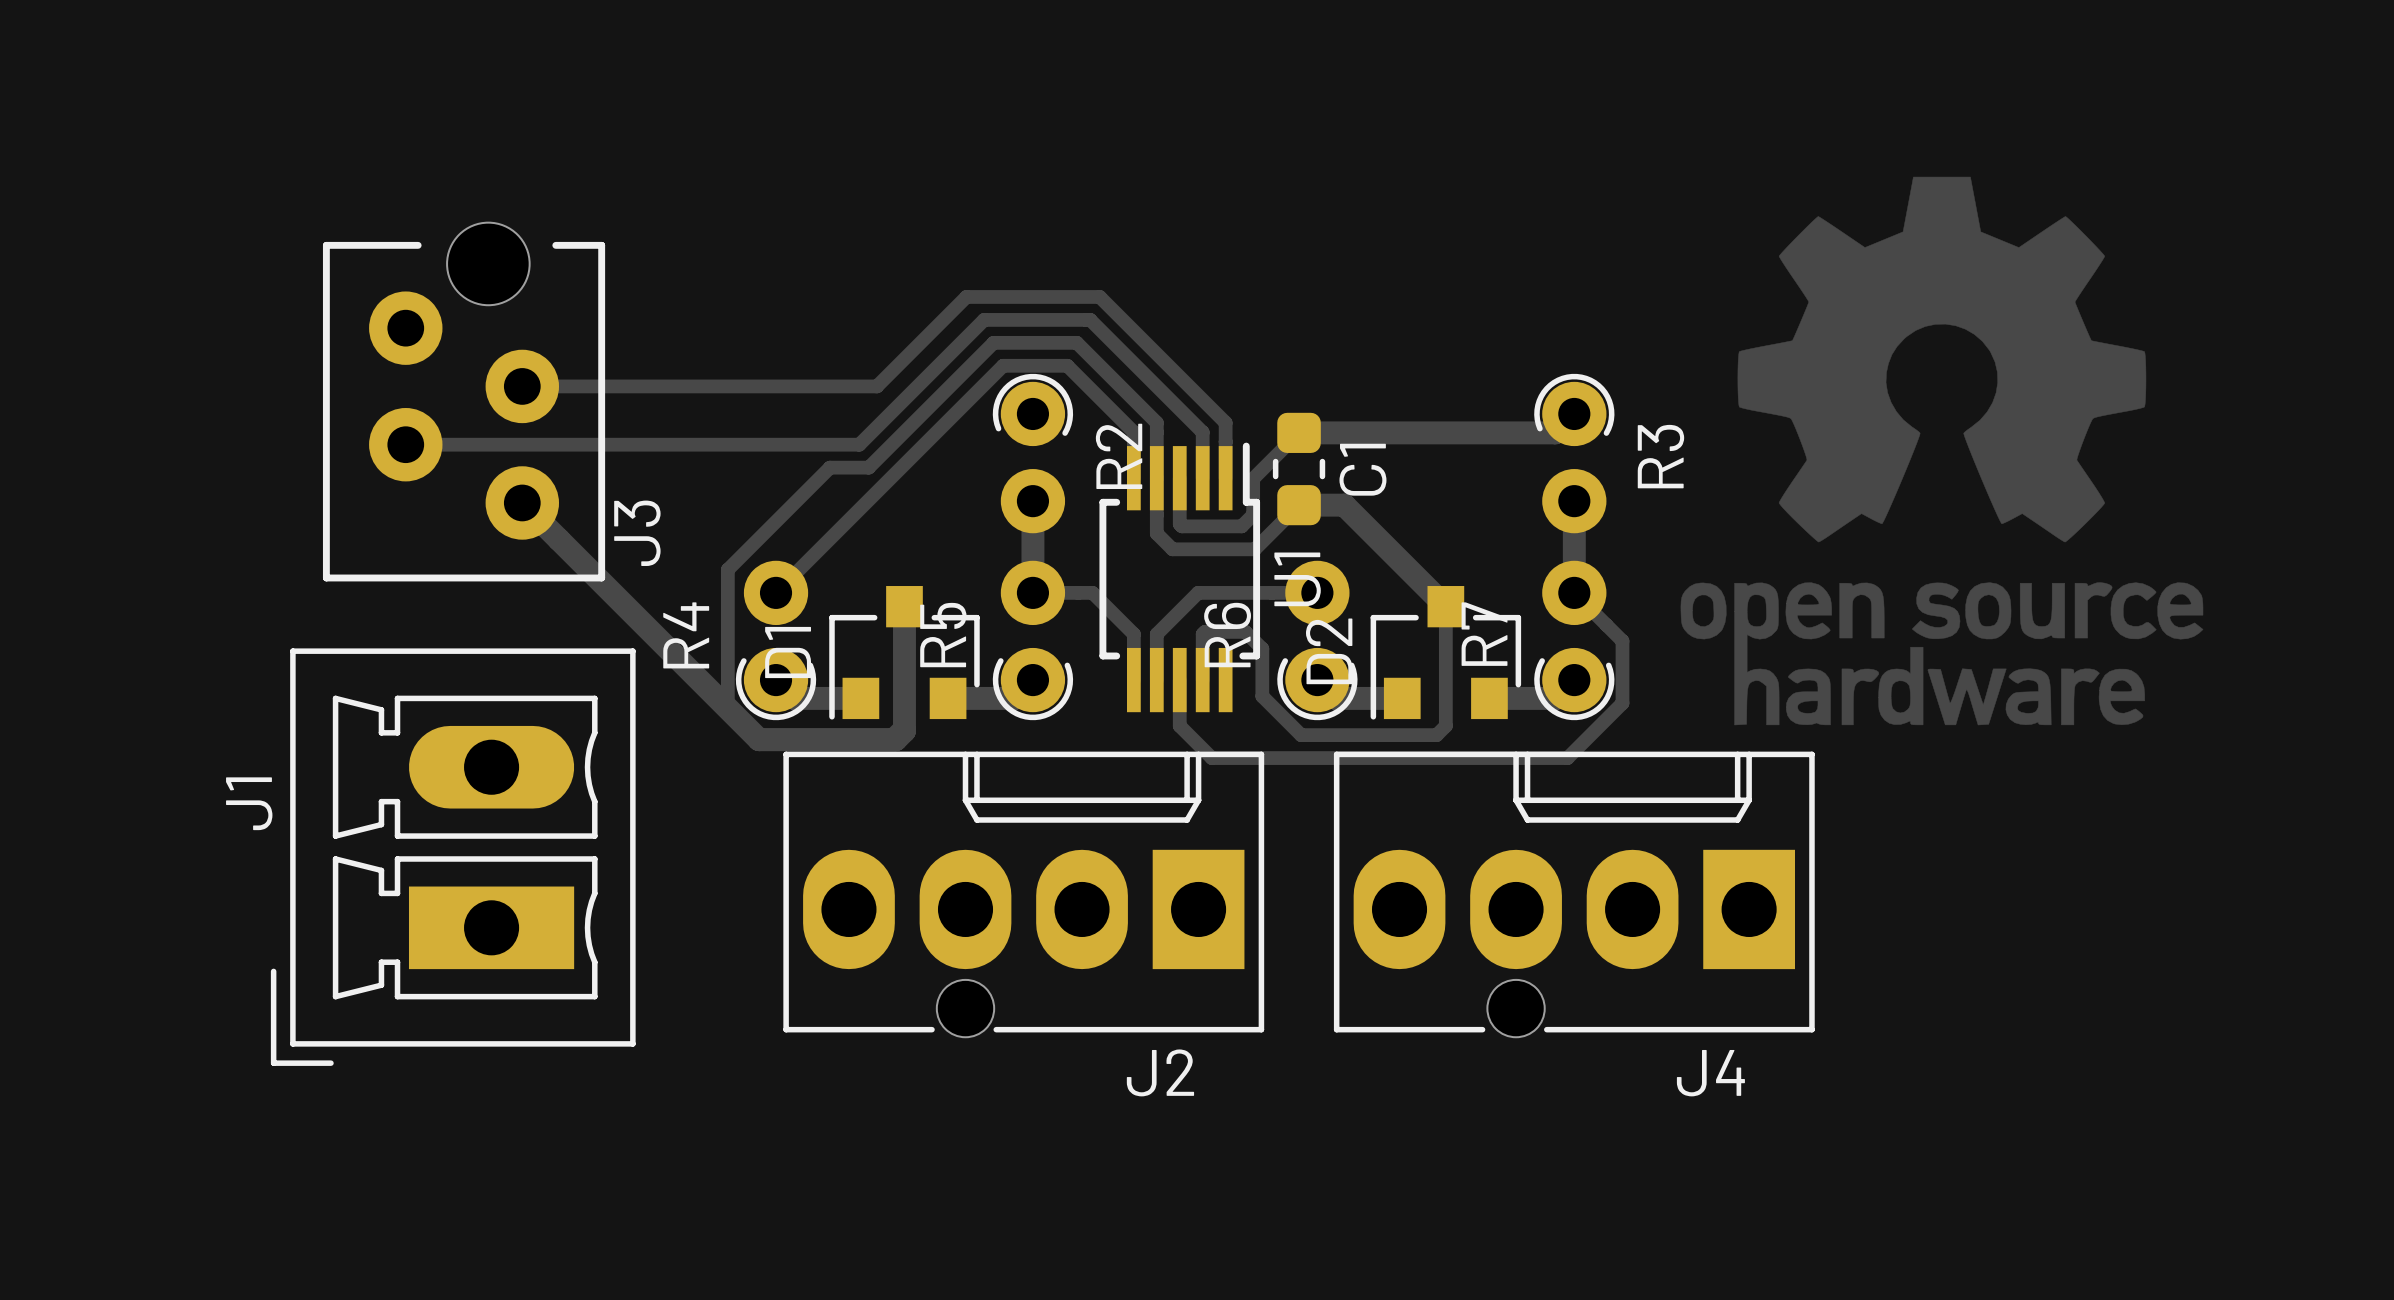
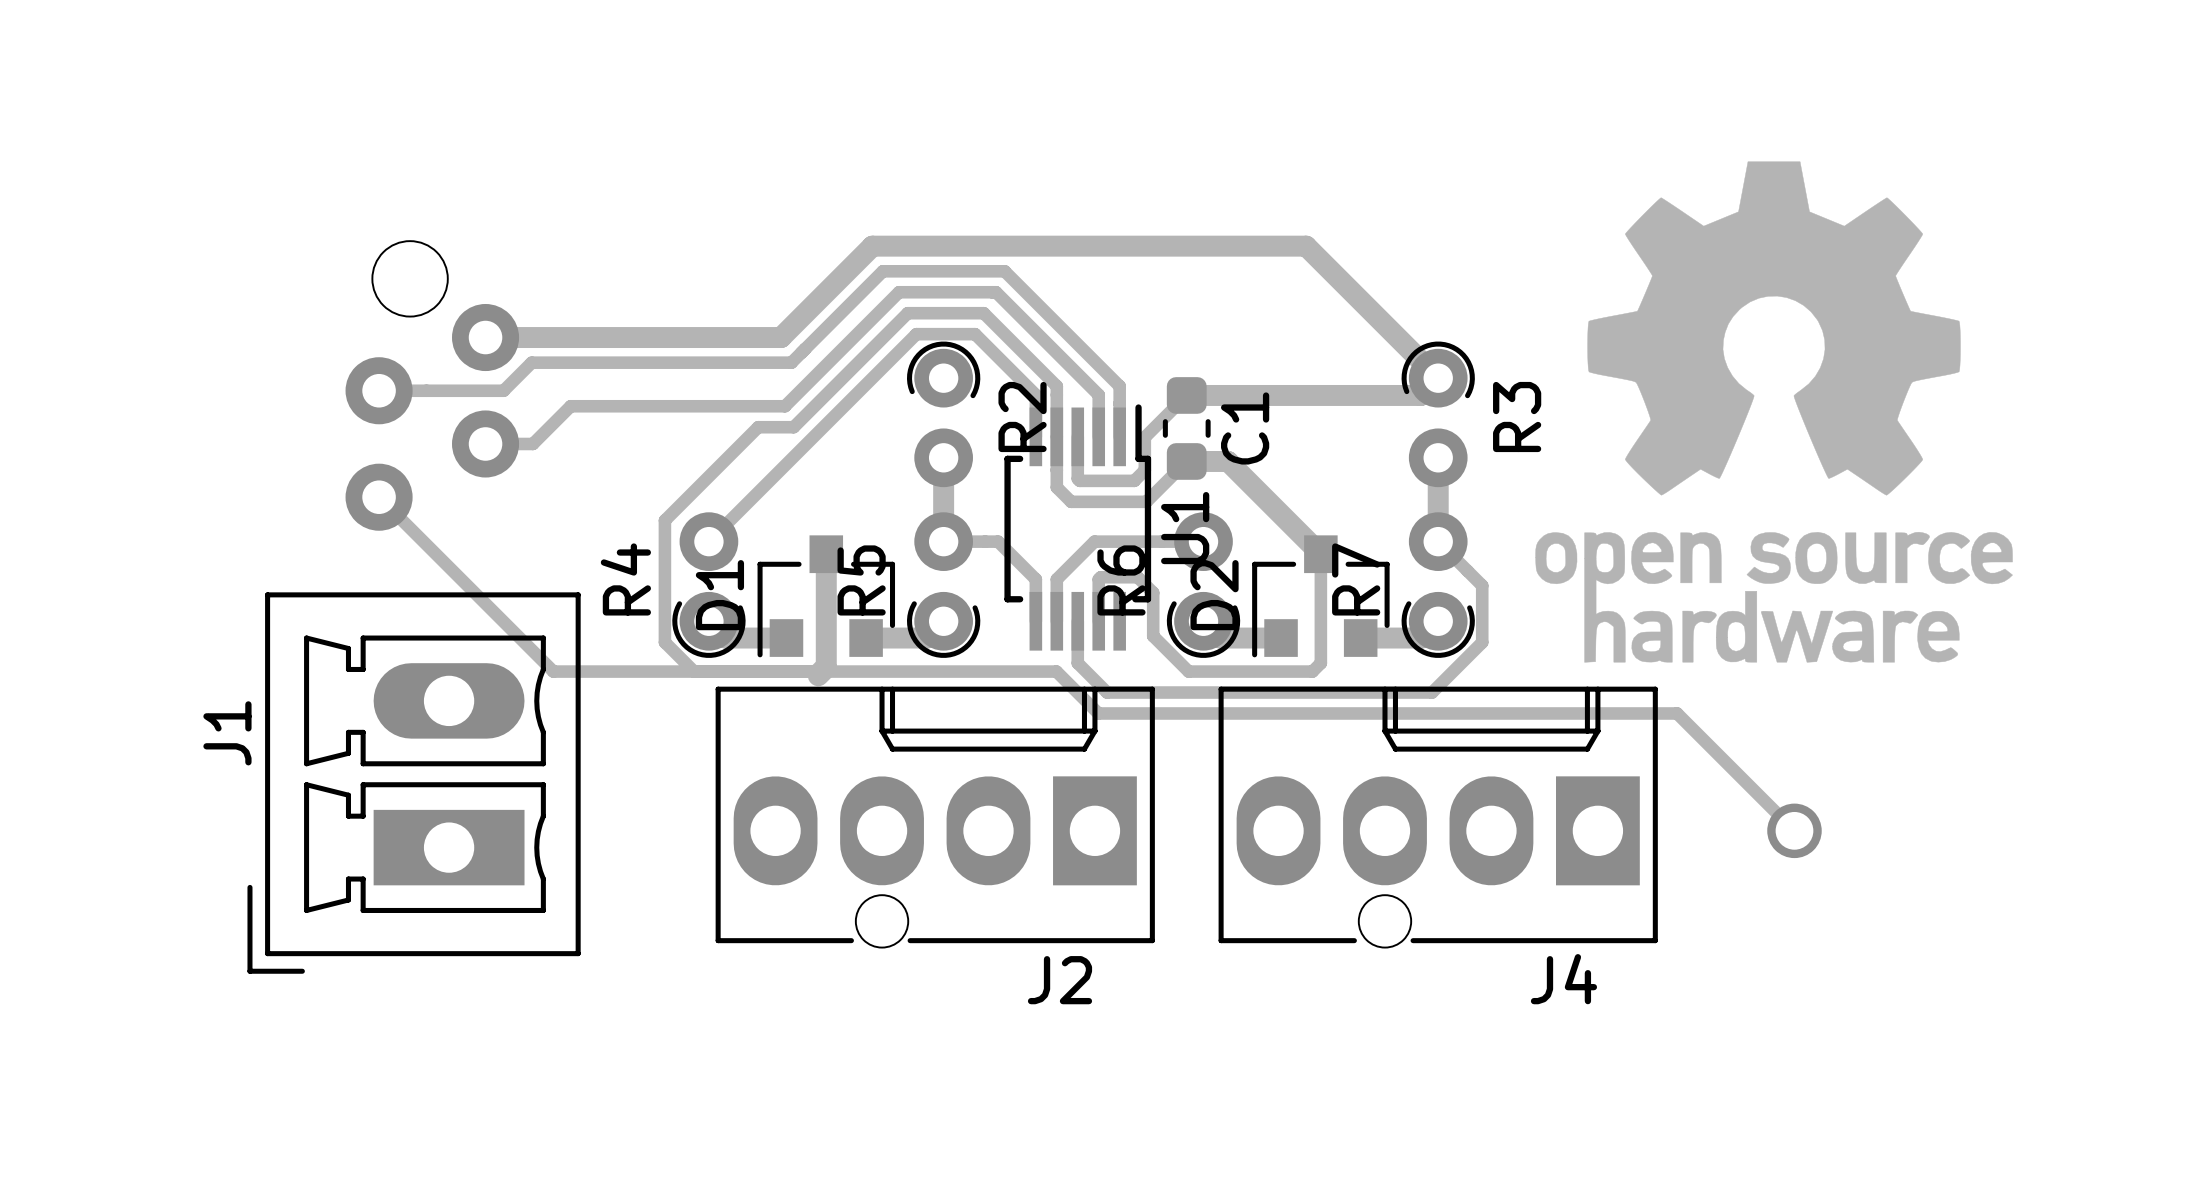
track: none -> (485, 337) (781, 337) (872, 246) (1306, 246) (1438, 378)
track: (522, 386) (876, 386) -> (379, 390) (503, 390) (531, 362) (791, 362) (801, 353)
J3 side: top (464, 402) -> bottom (432, 385)
track: (405, 444) (624, 444) -> (485, 443) (532, 443) (570, 406)
track: (522, 502) (759, 739) (895, 739) -> none
track: none -> (379, 497) (553, 671) (694, 671)
track: none -> (814, 671) (1056, 671) (1098, 713) (1677, 713) (1794, 830)
via: none -> (1794, 830)

